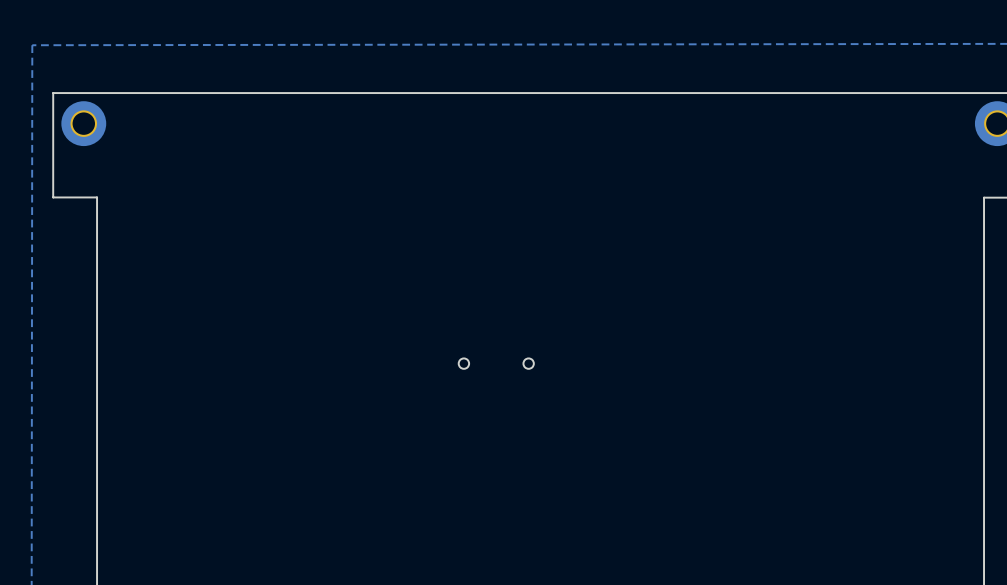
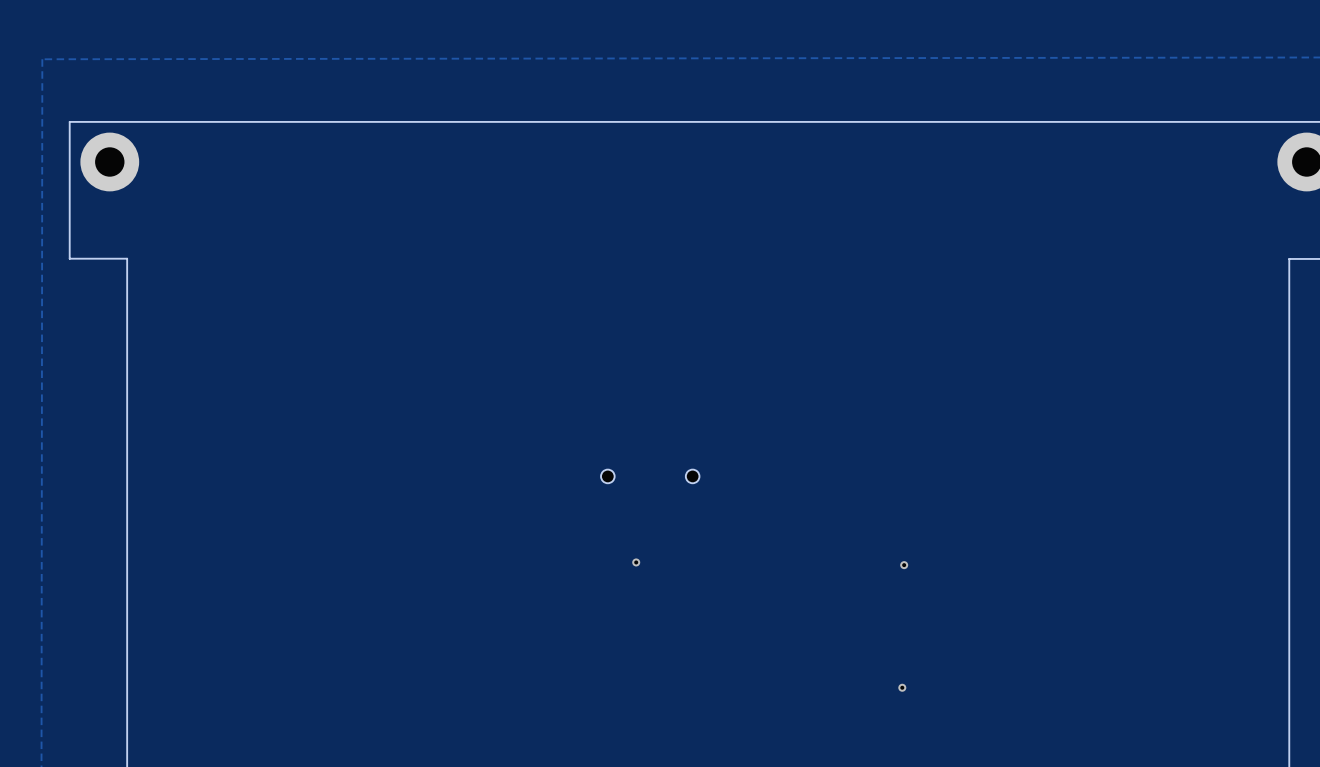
via: none -> (636, 562)
via: none -> (904, 565)
via: none -> (902, 687)

